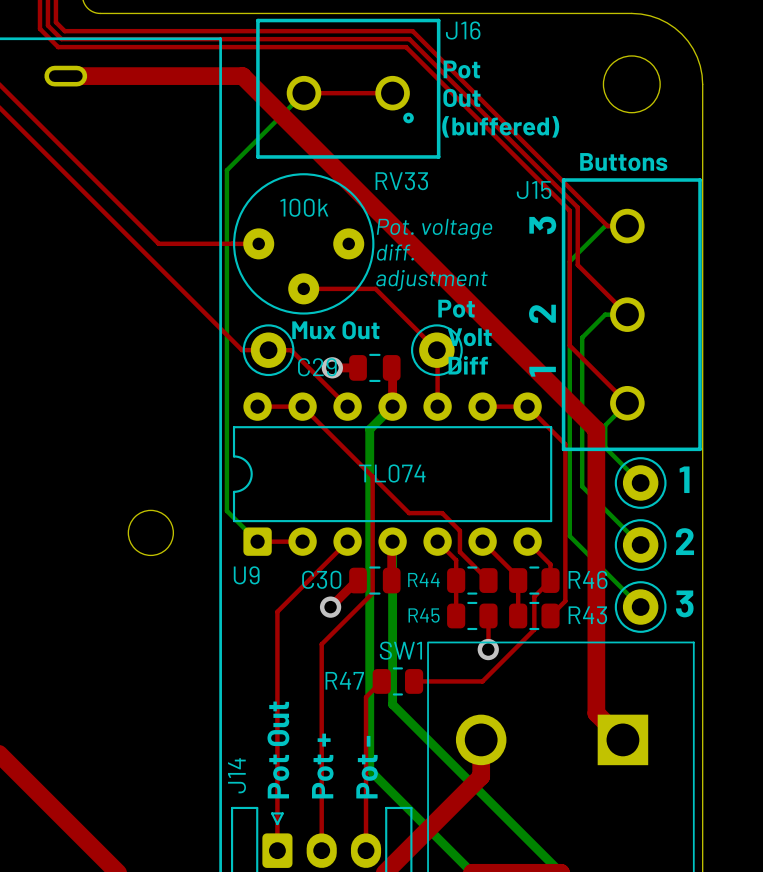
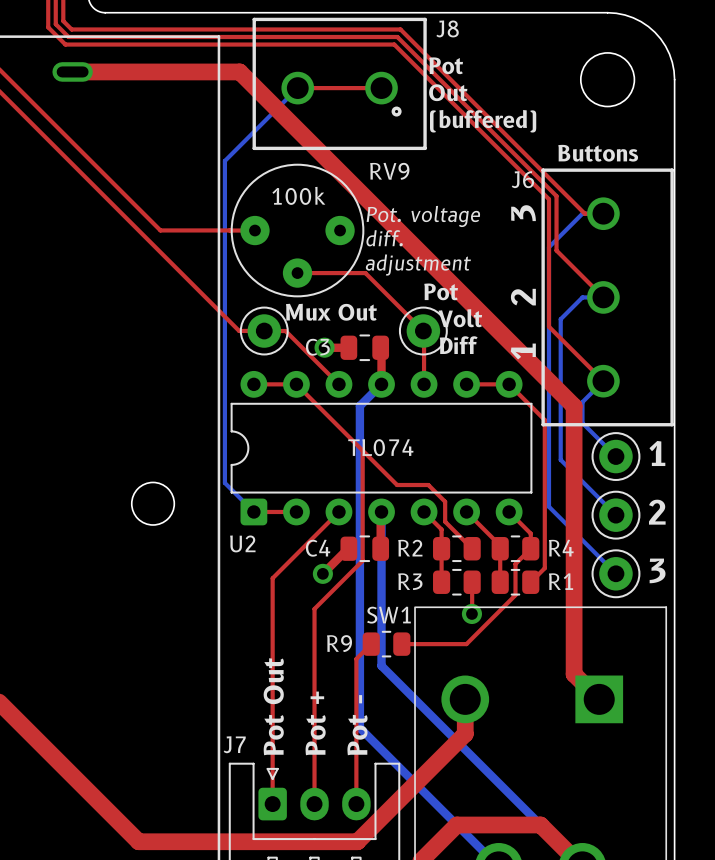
J16 name: J16 (463, 30) -> J8 (447, 28)
RV33 name: RV33 (401, 181) -> RV9 (389, 171)
J15 name: J15 (534, 190) -> J6 (522, 179)
C29 name: C29 (317, 367) -> C3 (317, 347)
U9 name: U9 (246, 575) -> U2 (242, 543)
C30 name: C30 (321, 579) -> C4 (318, 548)
R46 name: R46 (588, 579) -> R4 (561, 548)
R44 name: R44 (423, 580) -> R2 (410, 548)
R45 name: R45 (424, 615) -> R3 (410, 581)
R43 name: R43 (587, 615) -> R1 (561, 581)
R47 name: R47 (344, 680) -> R9 (339, 643)
J14 name: J14 (236, 775) -> J7 (234, 744)

